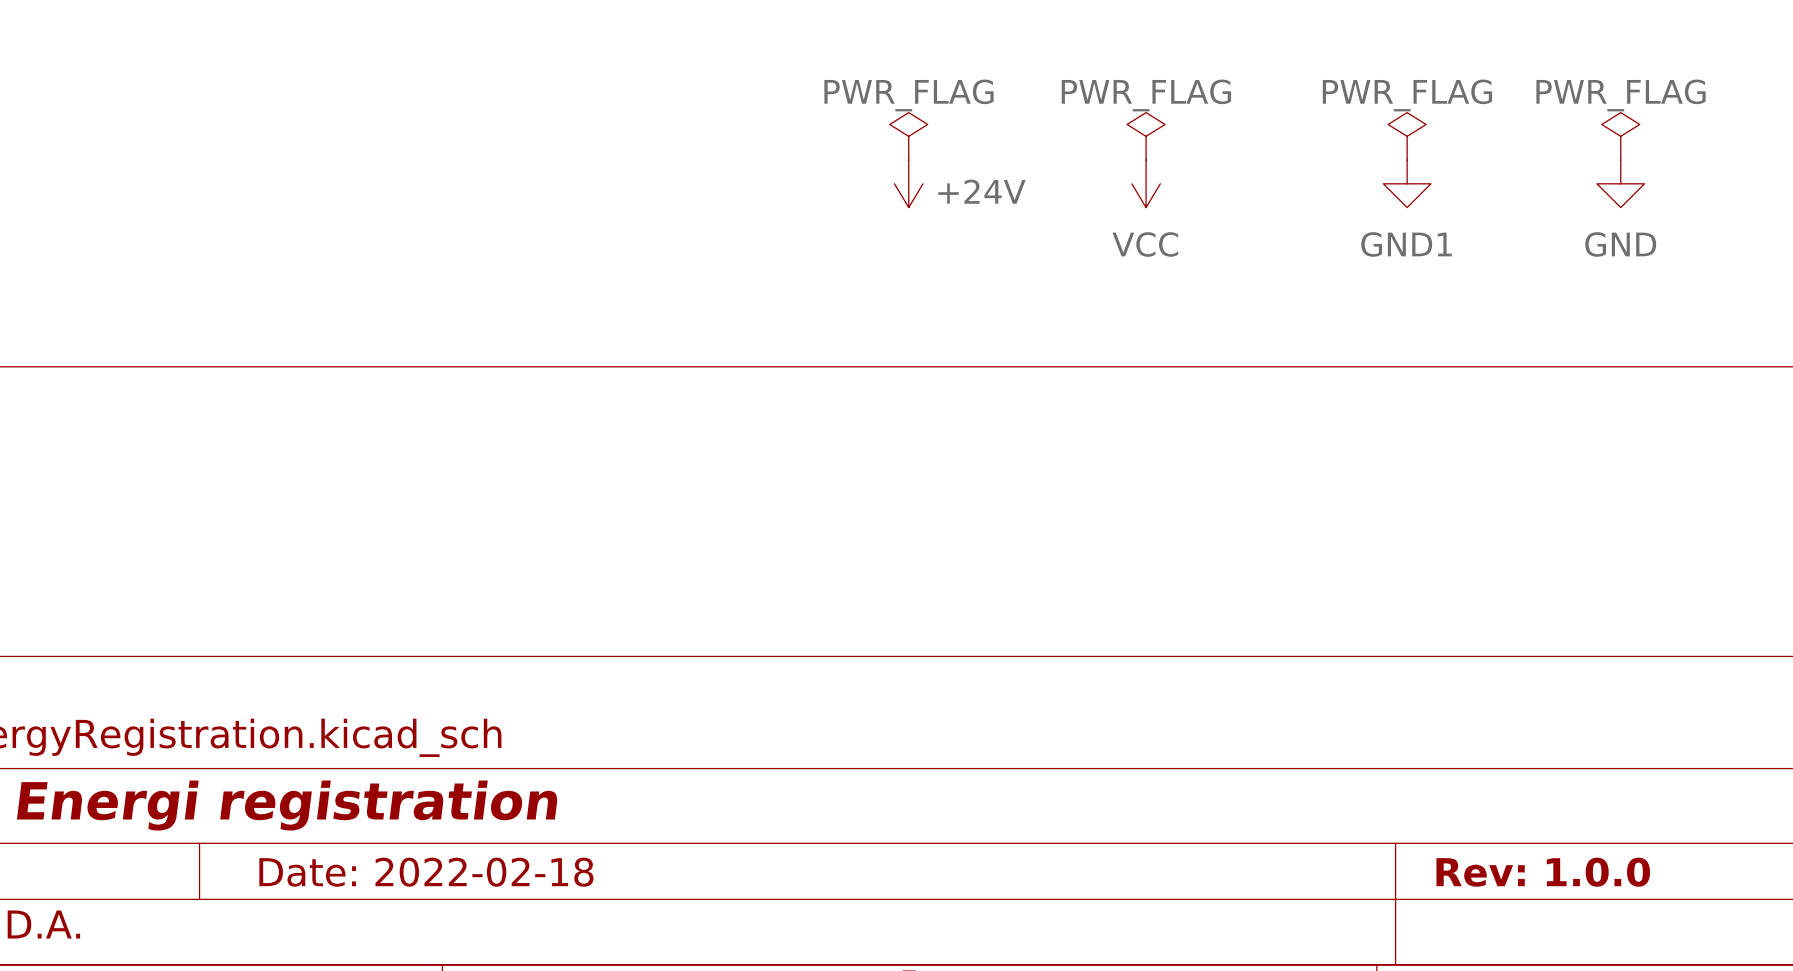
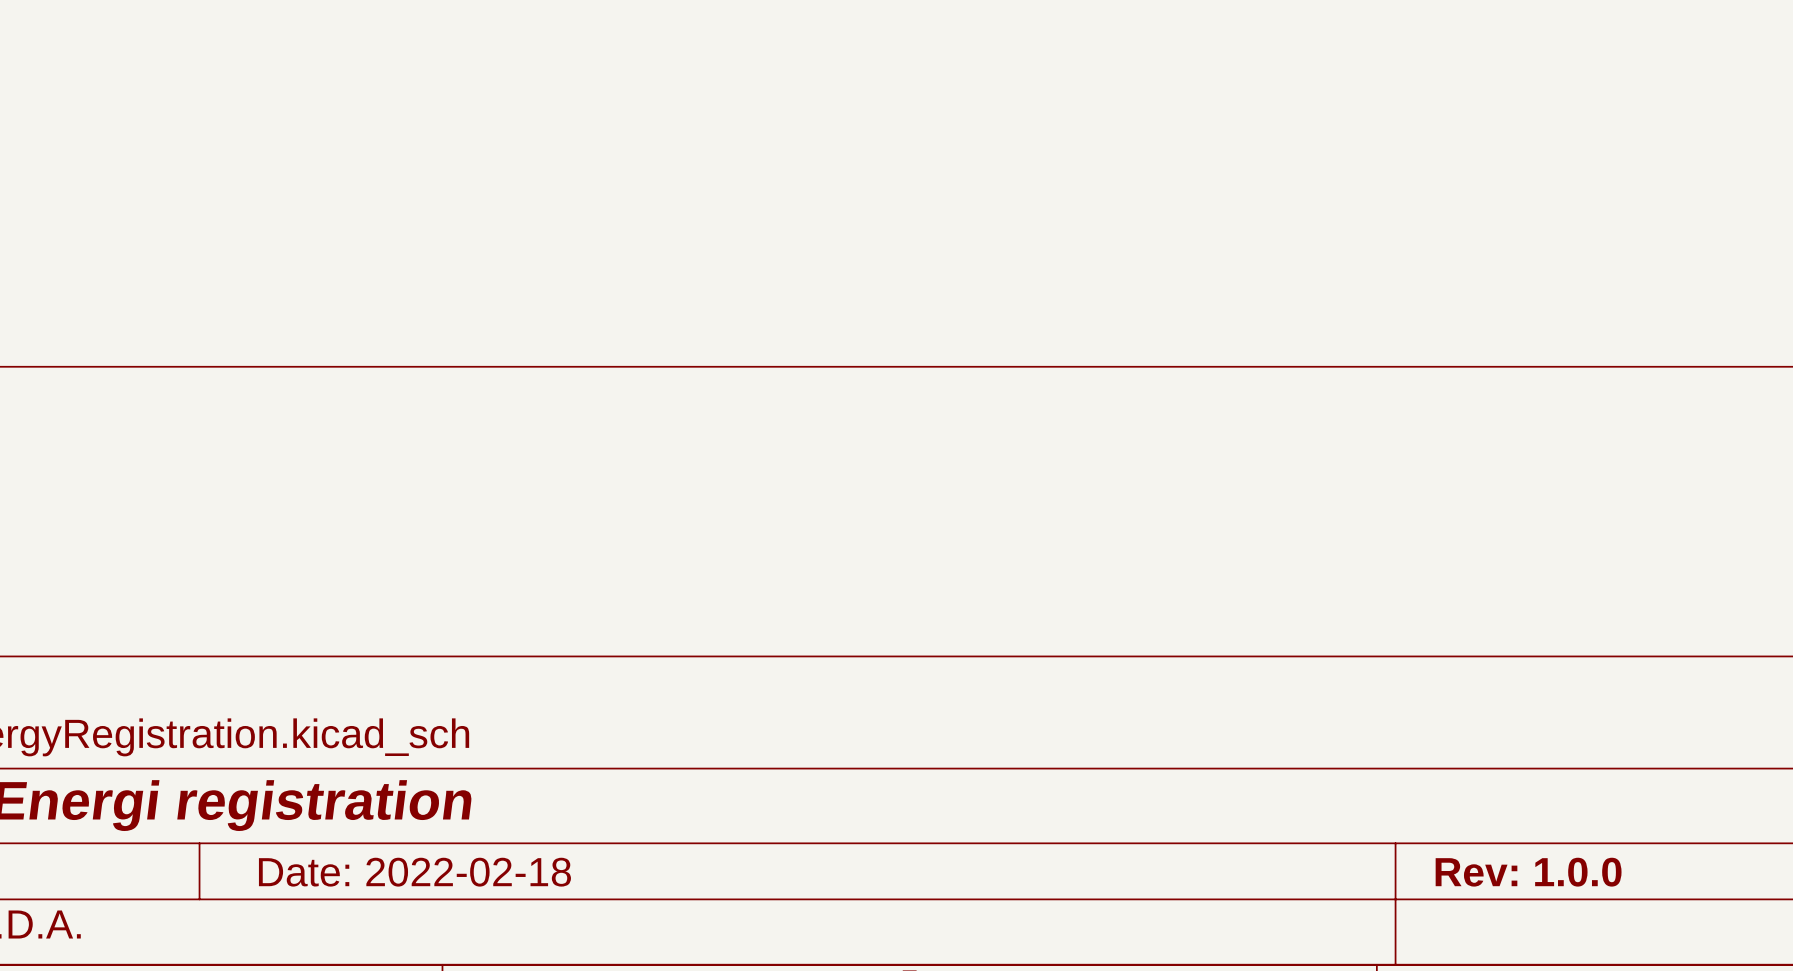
power symbol: PWR_FLAG (908, 136) -> none
power symbol: PWR_FLAG (1146, 136) -> none
power symbol: PWR_FLAG (1407, 136) -> none
power symbol: PWR_FLAG (1620, 136) -> none
power symbol: +24V (908, 183) -> none
power symbol: VCC (1146, 183) -> none
power symbol: GND1 (1407, 183) -> none
power symbol: GND (1620, 183) -> none

